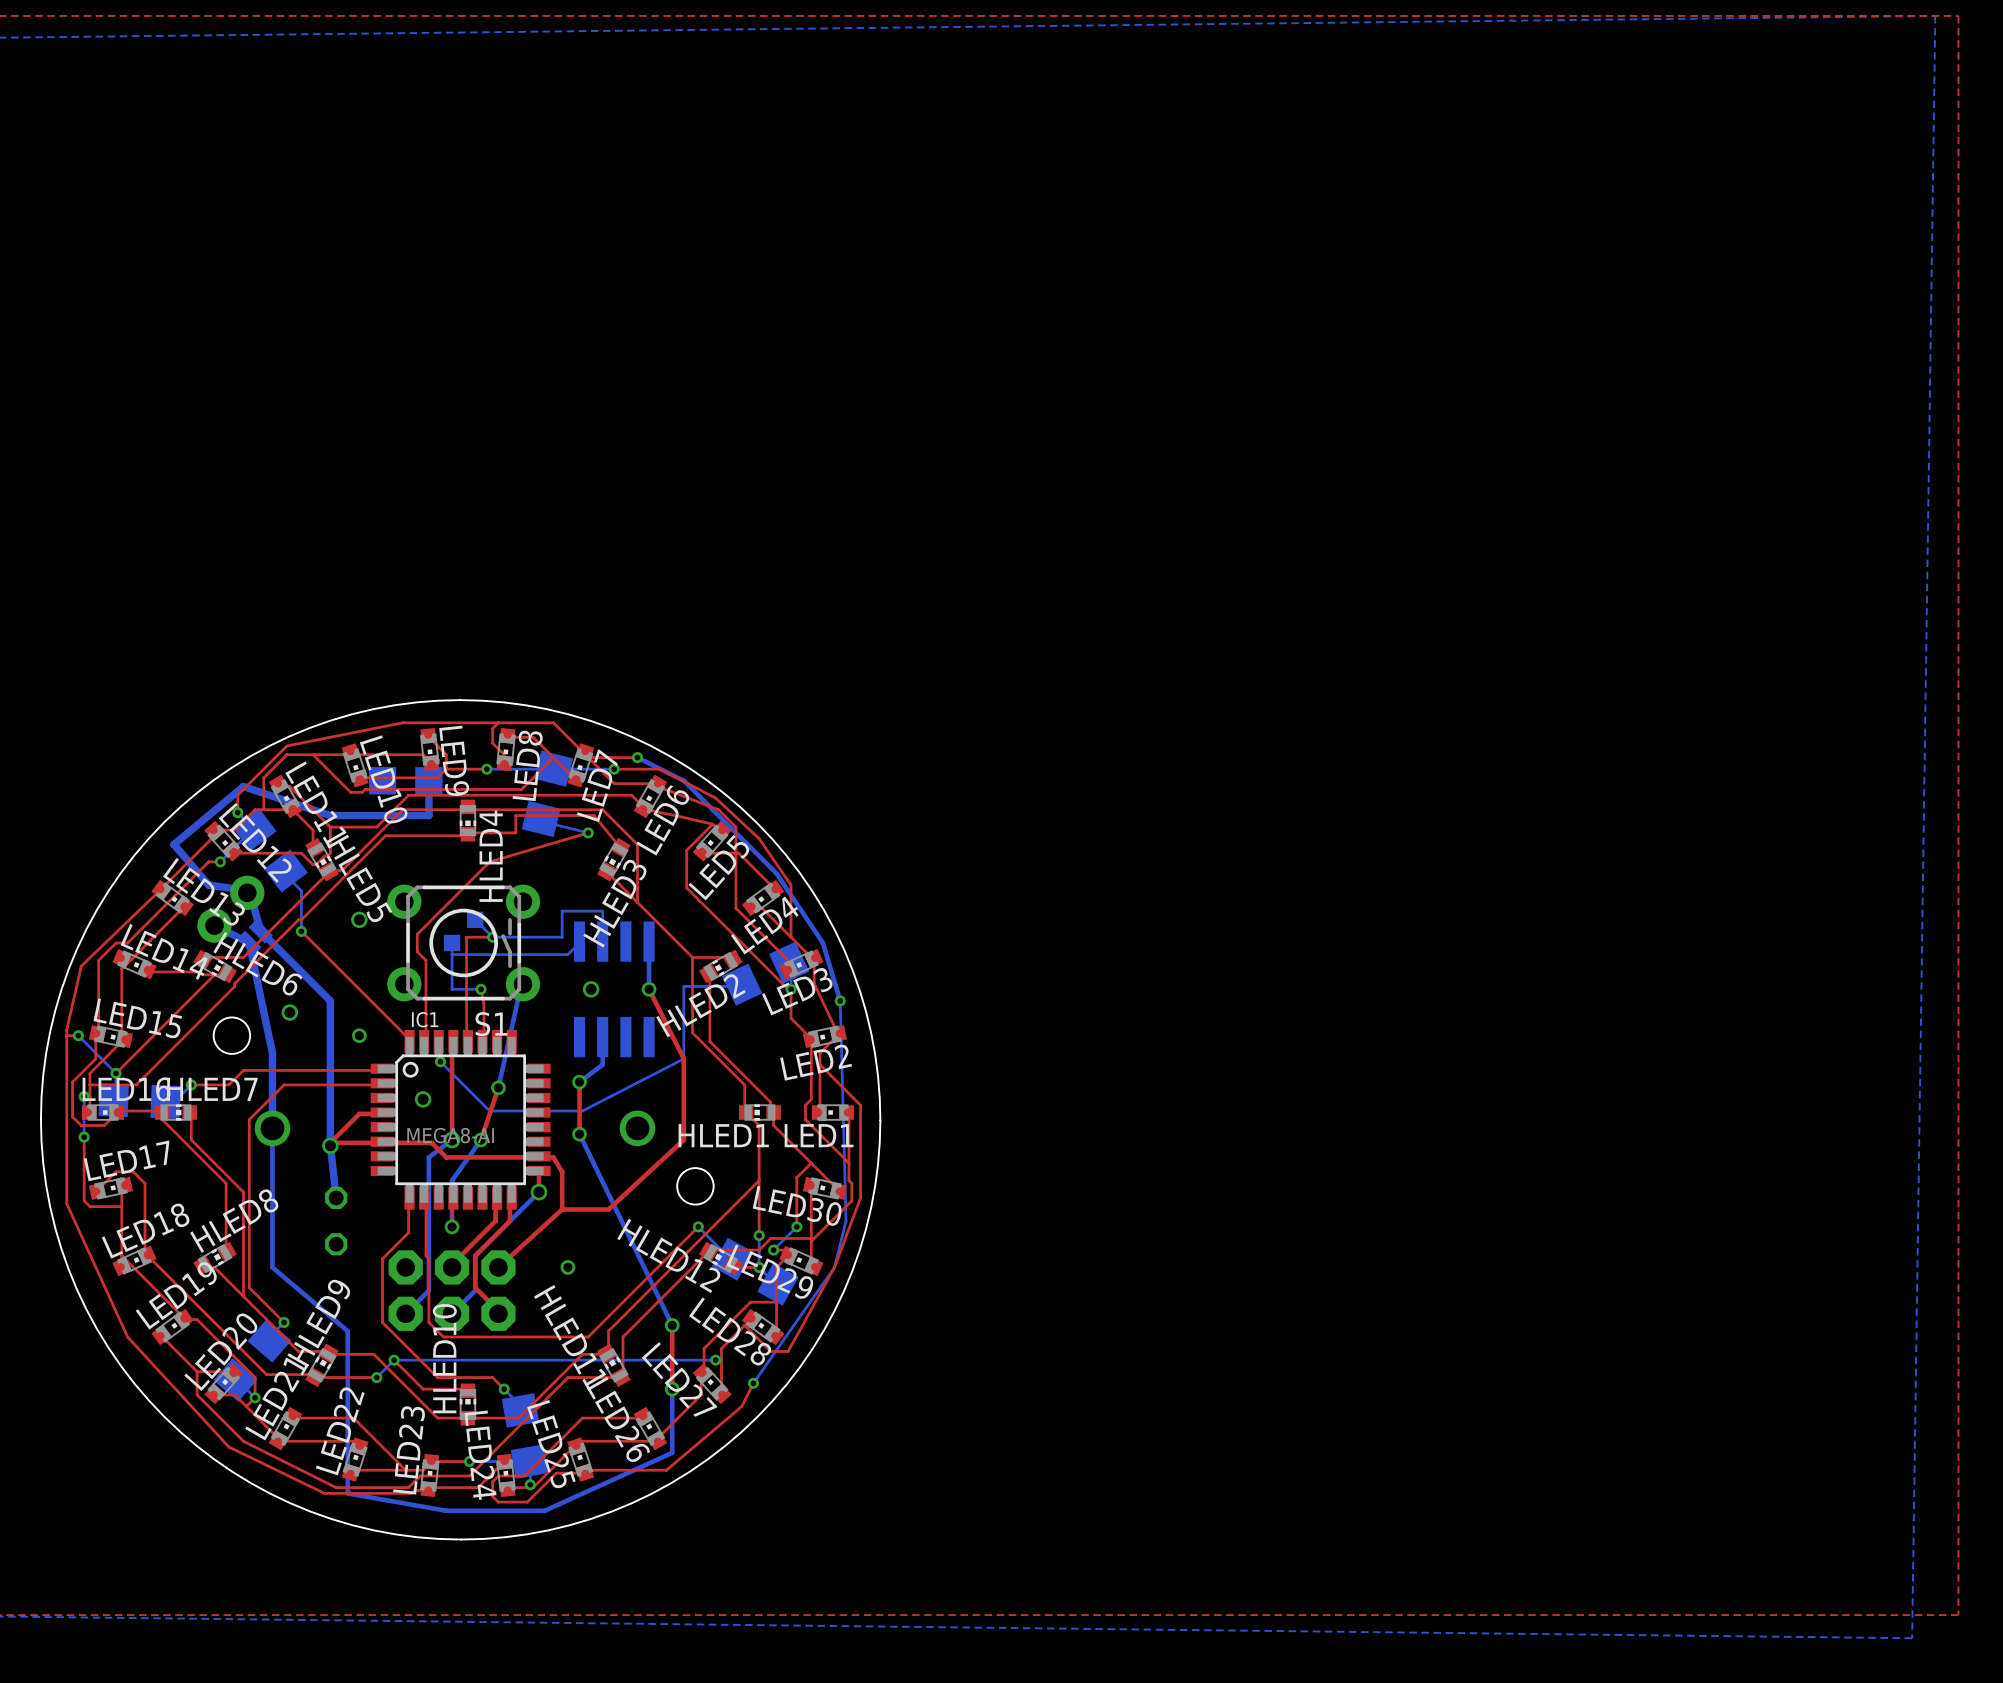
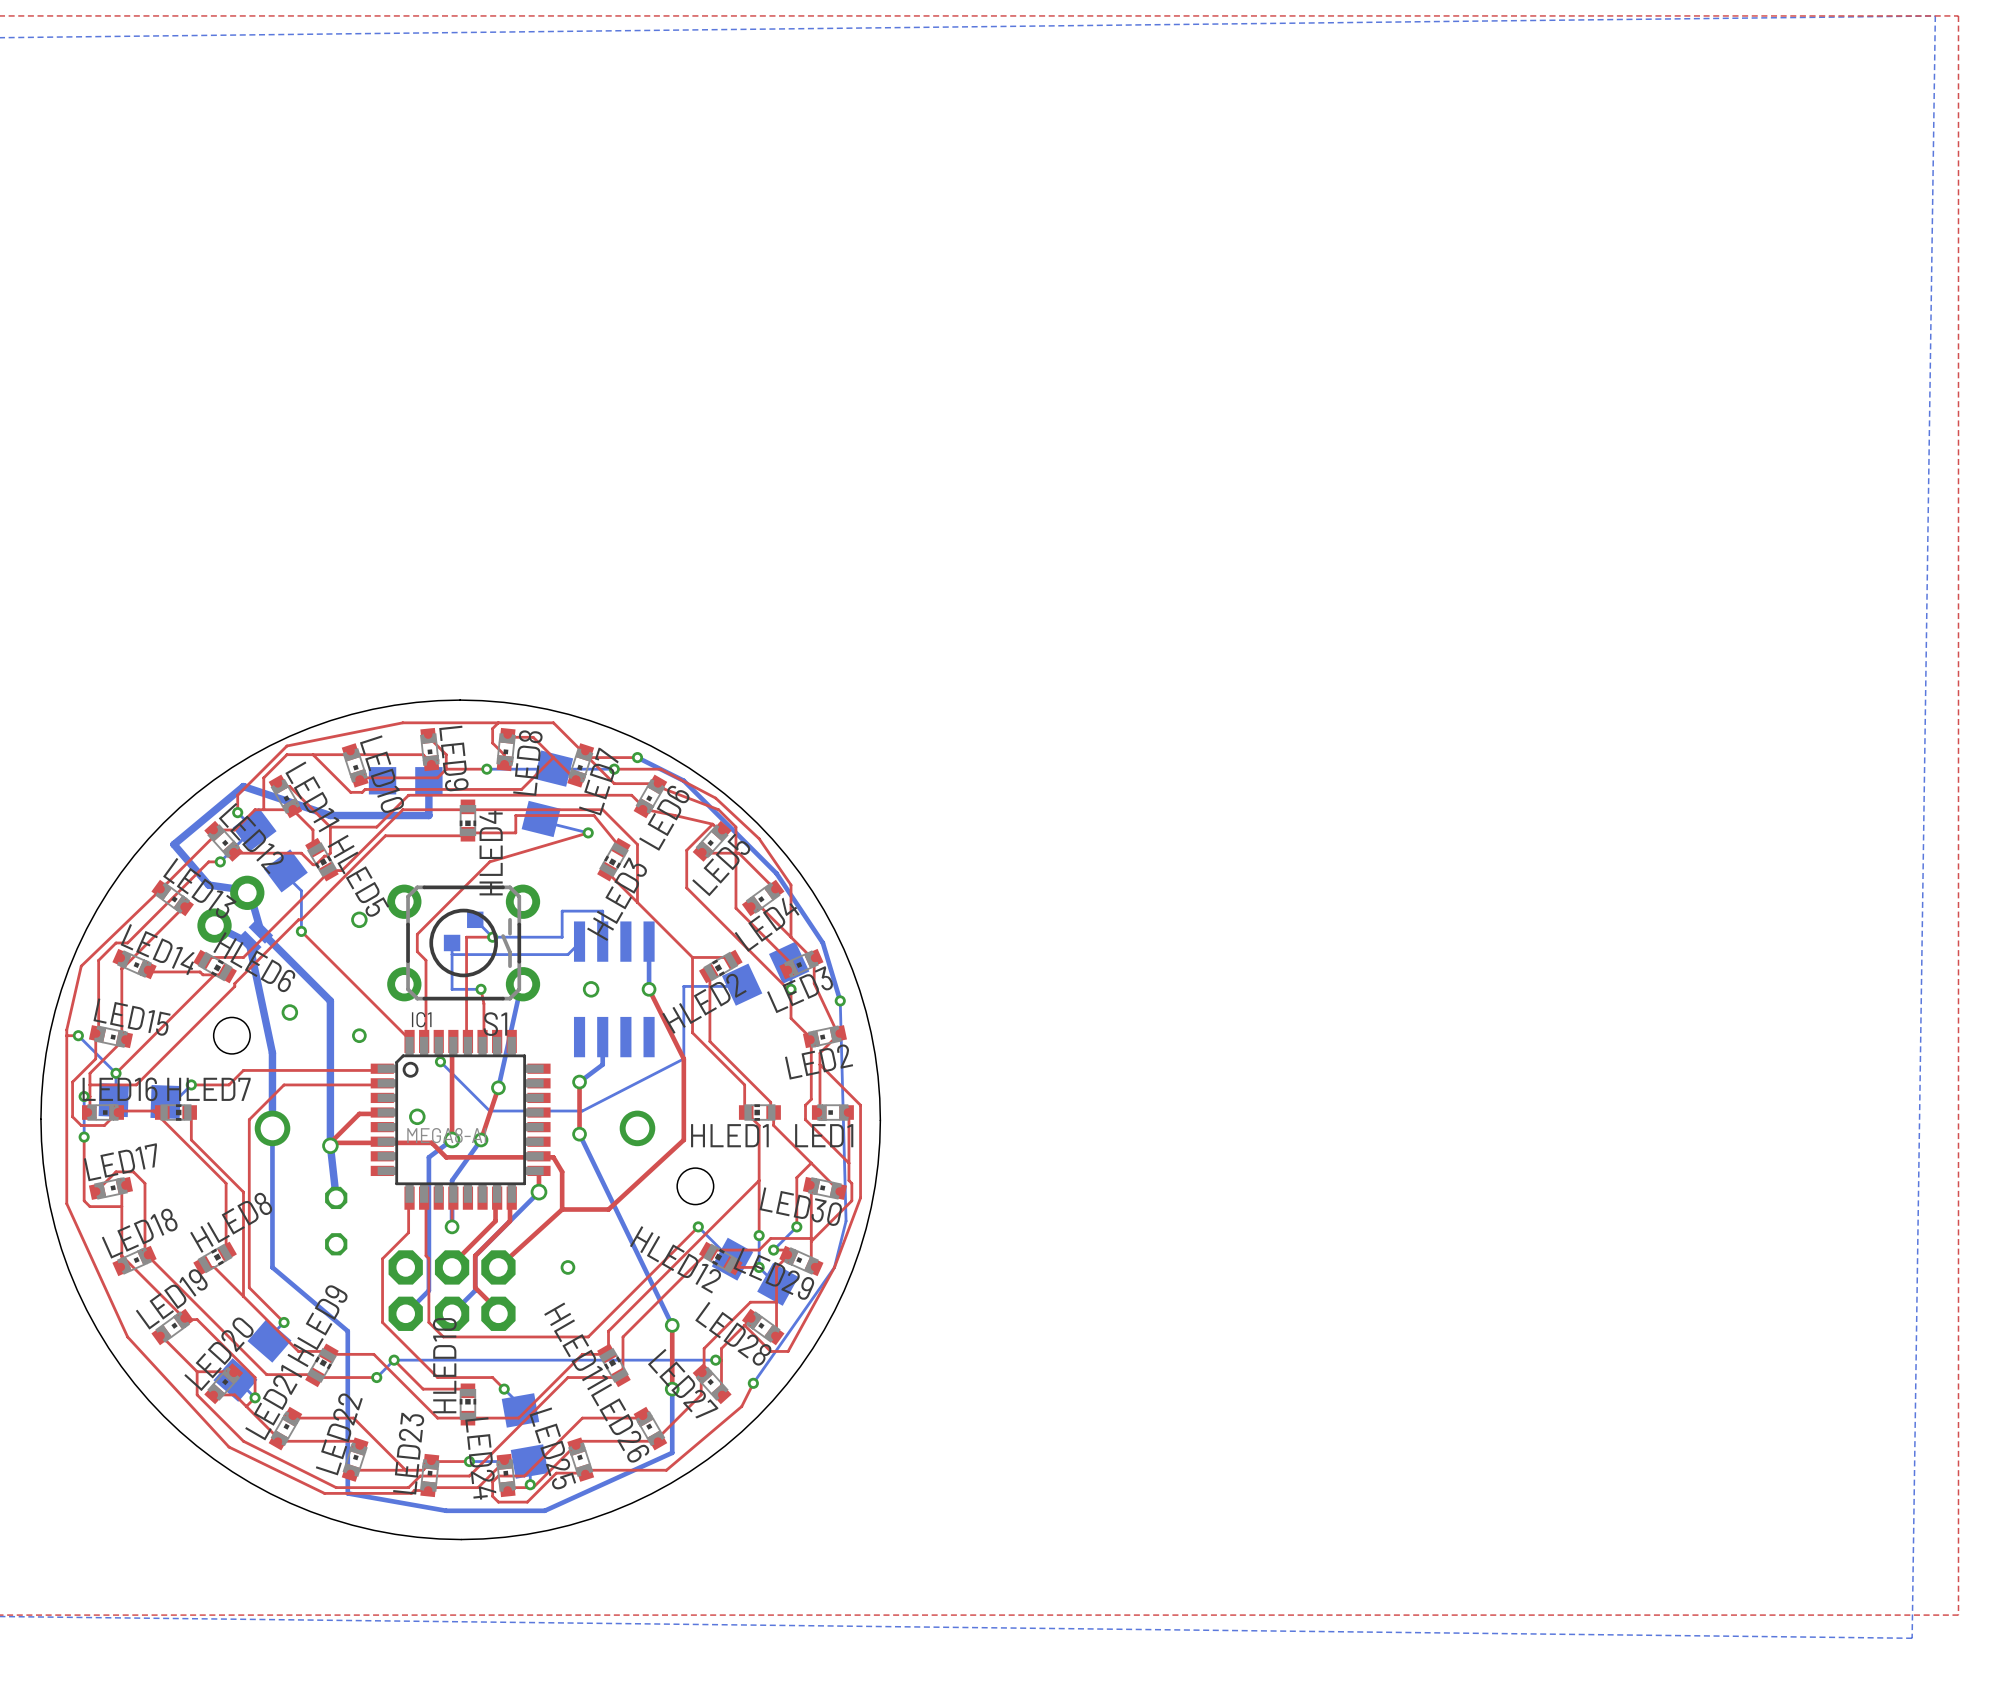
via position: (423, 1099) -> (417, 1116)

